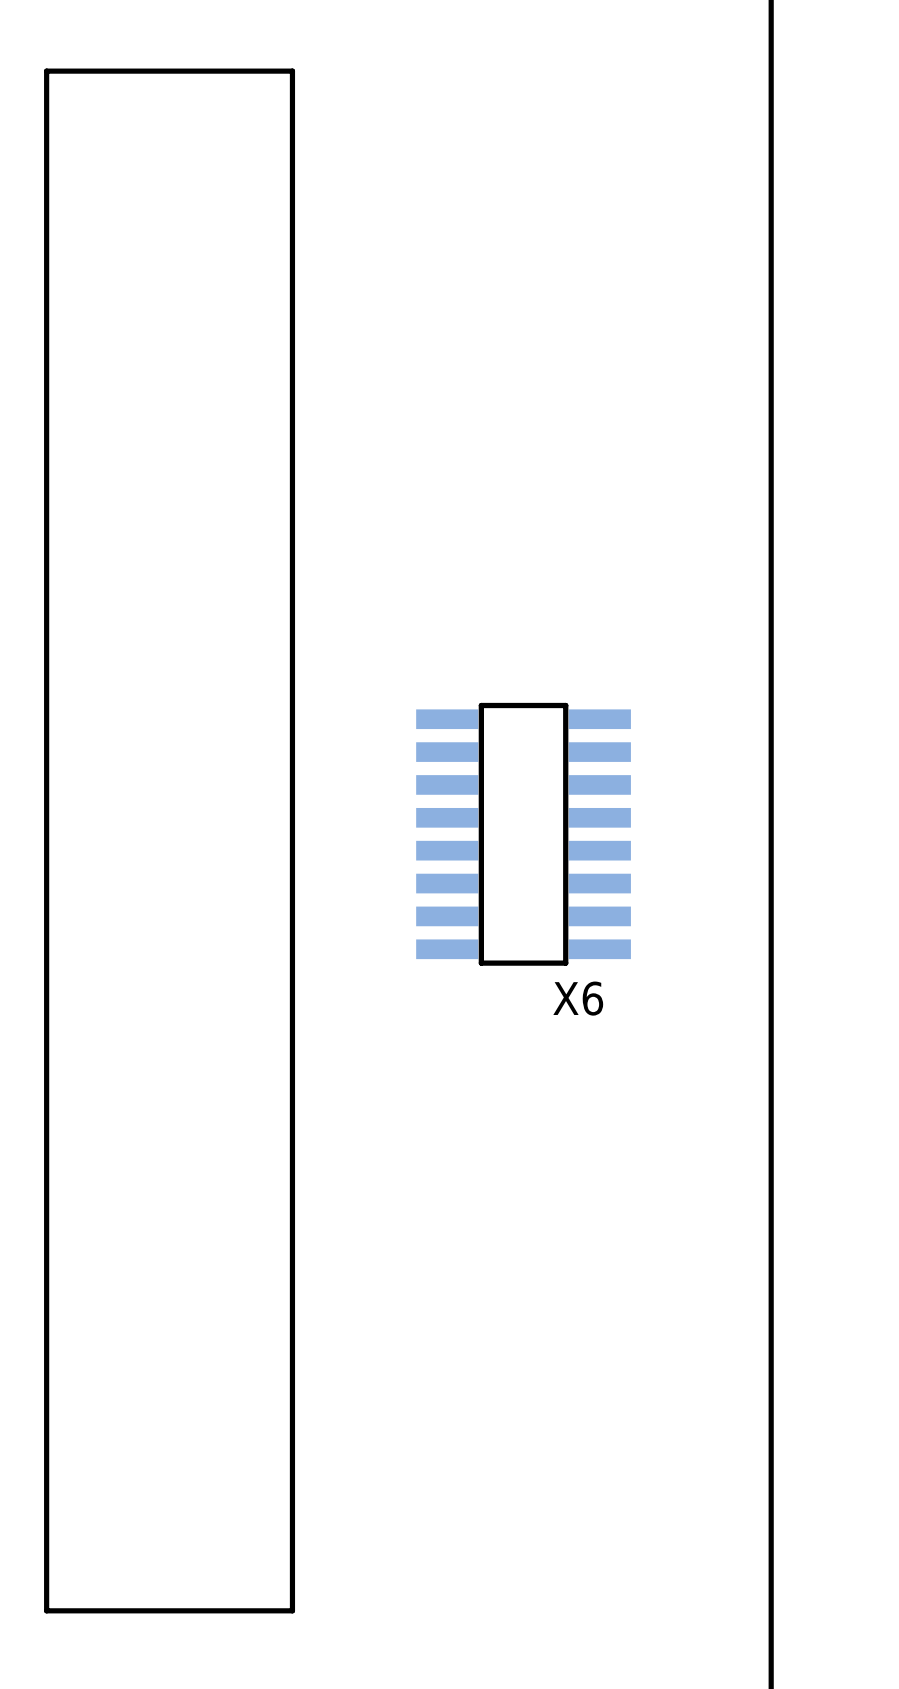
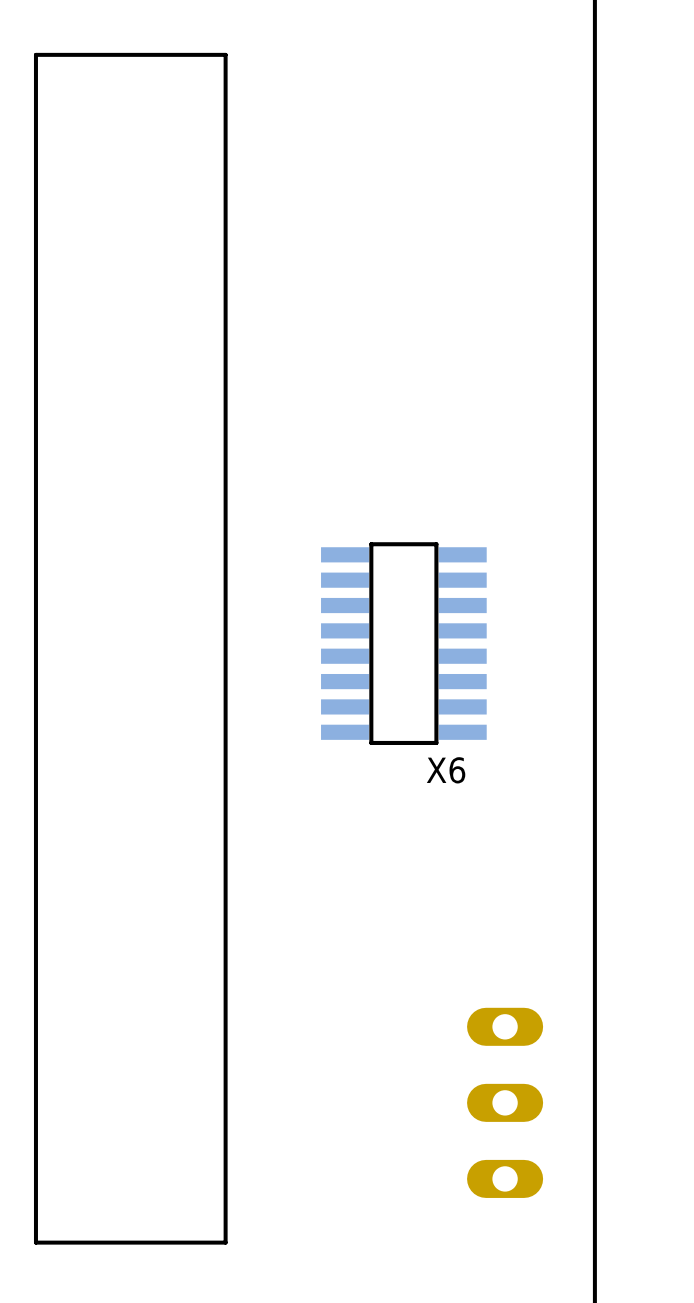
part: none -> (505, 1102)

